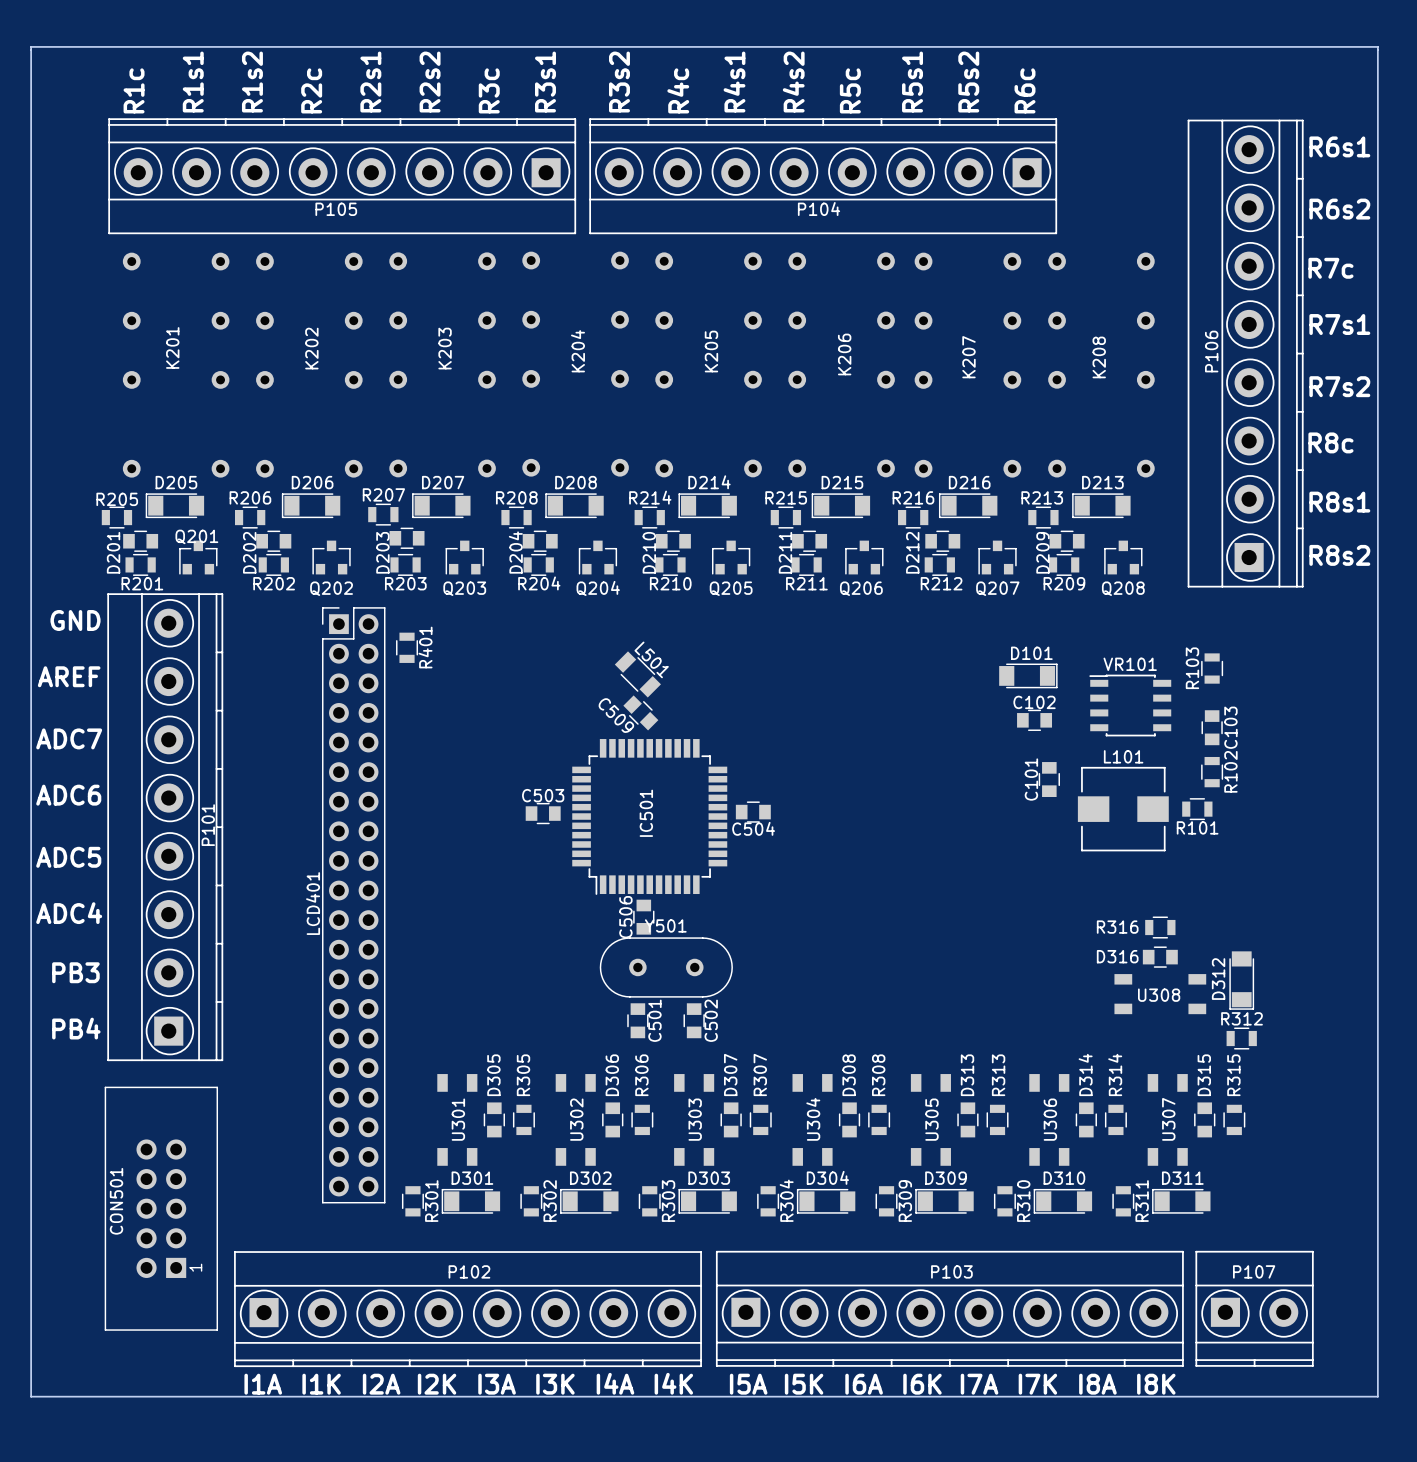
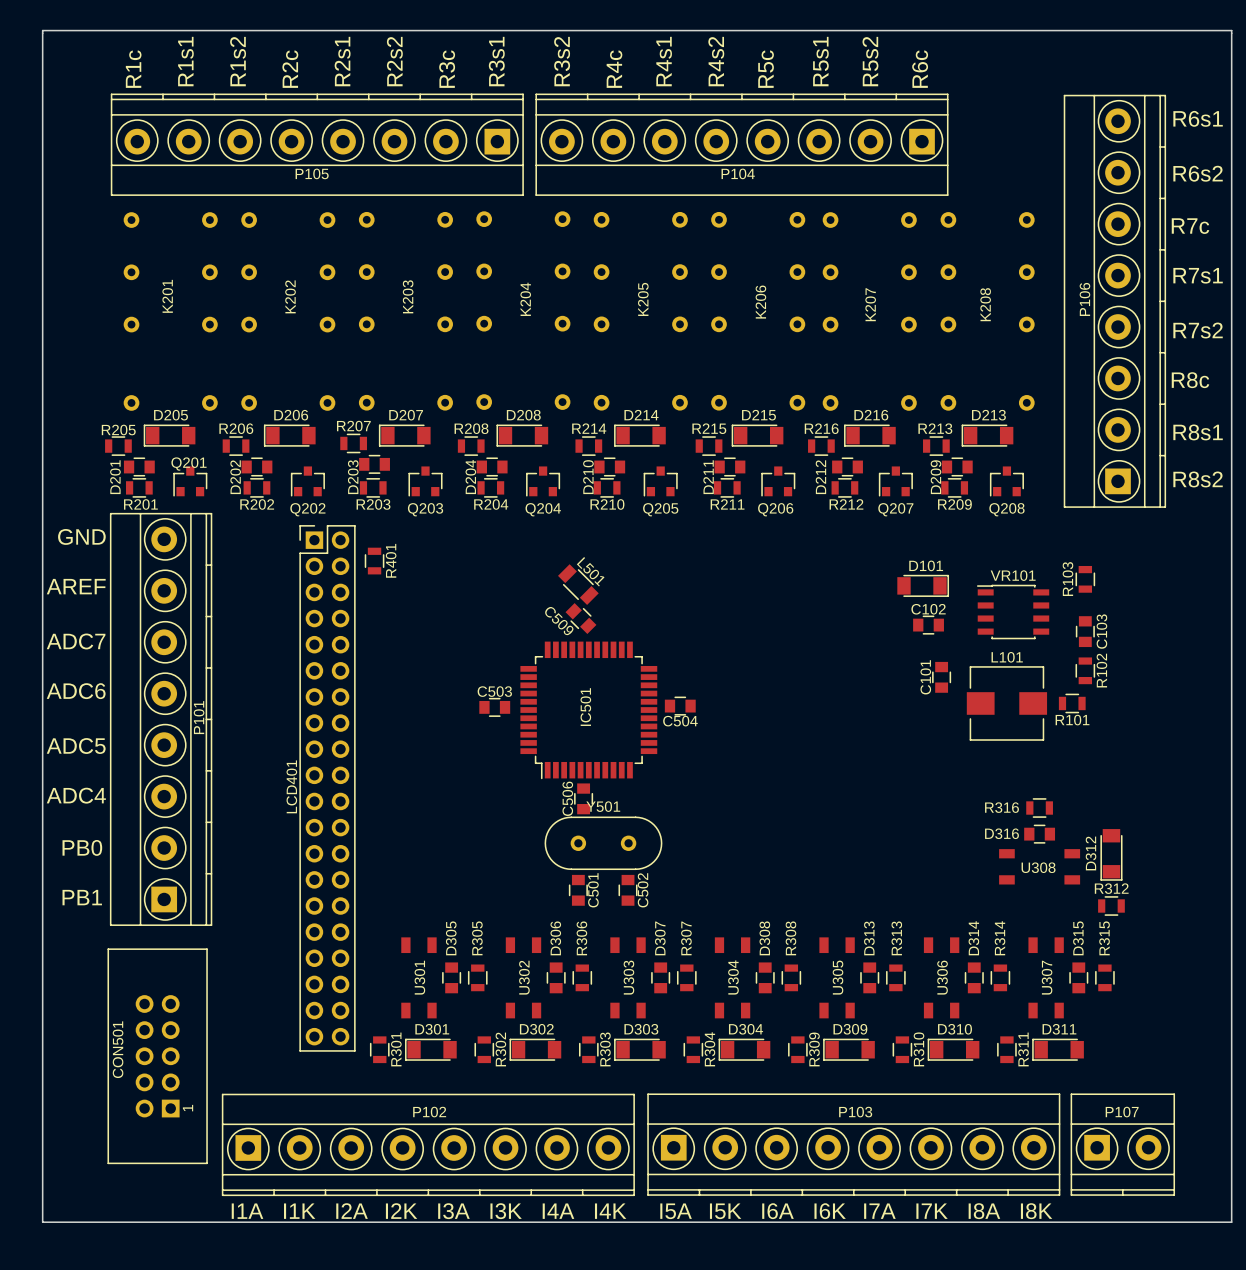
text: PB3 (75, 972) -> PB0 (82, 847)
text: PB4 (76, 1028) -> PB1 (82, 897)

